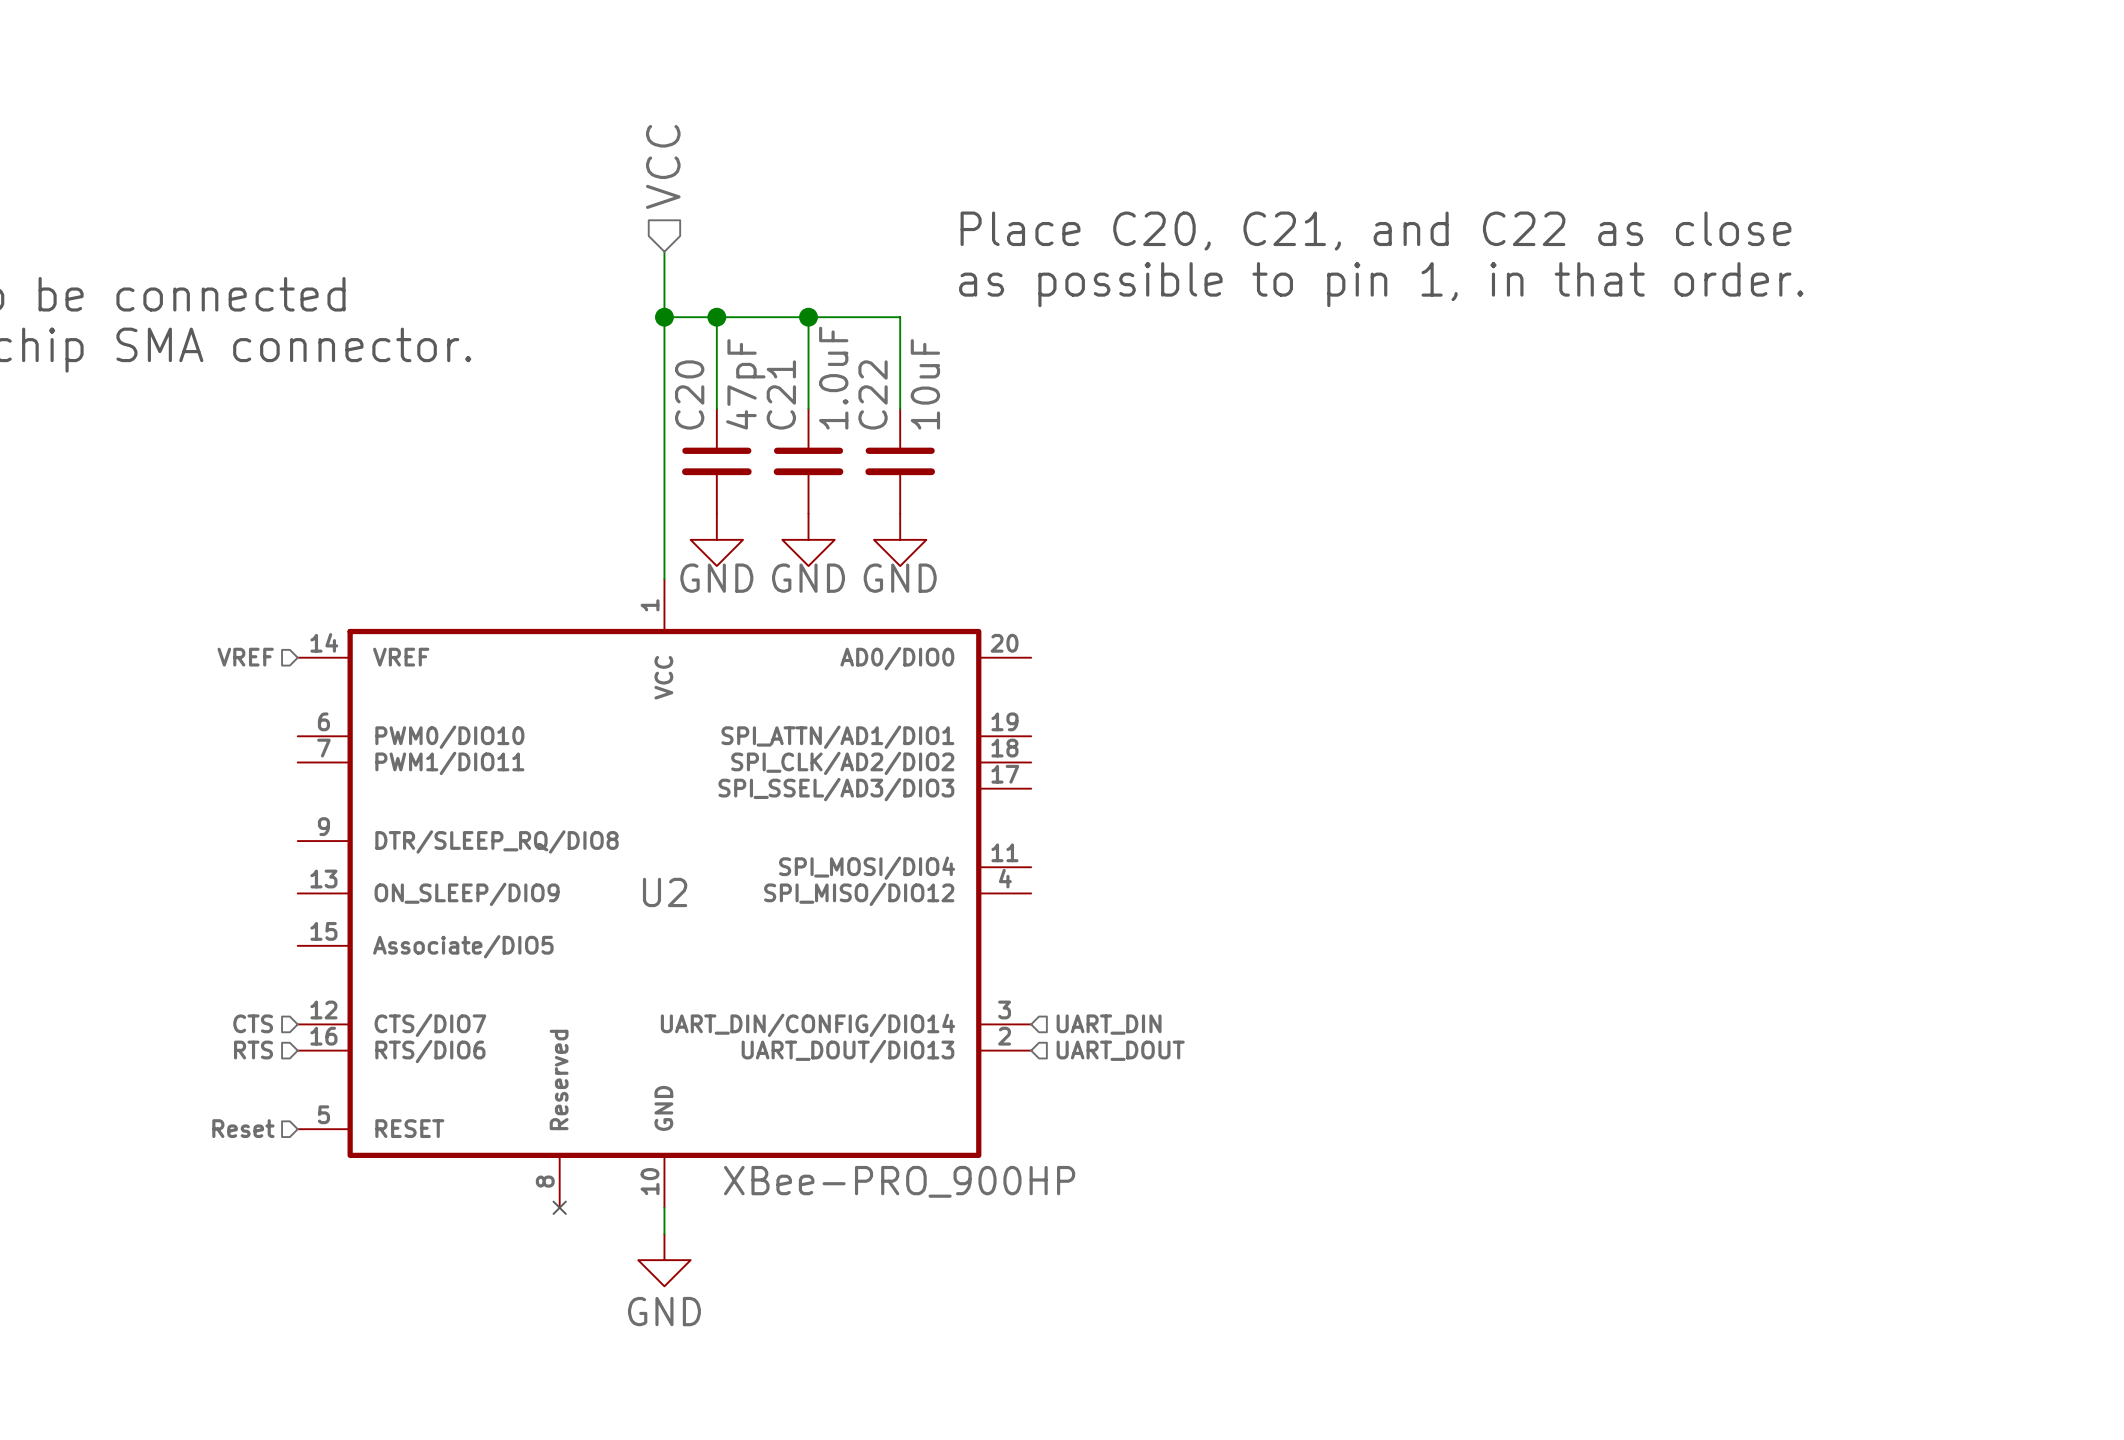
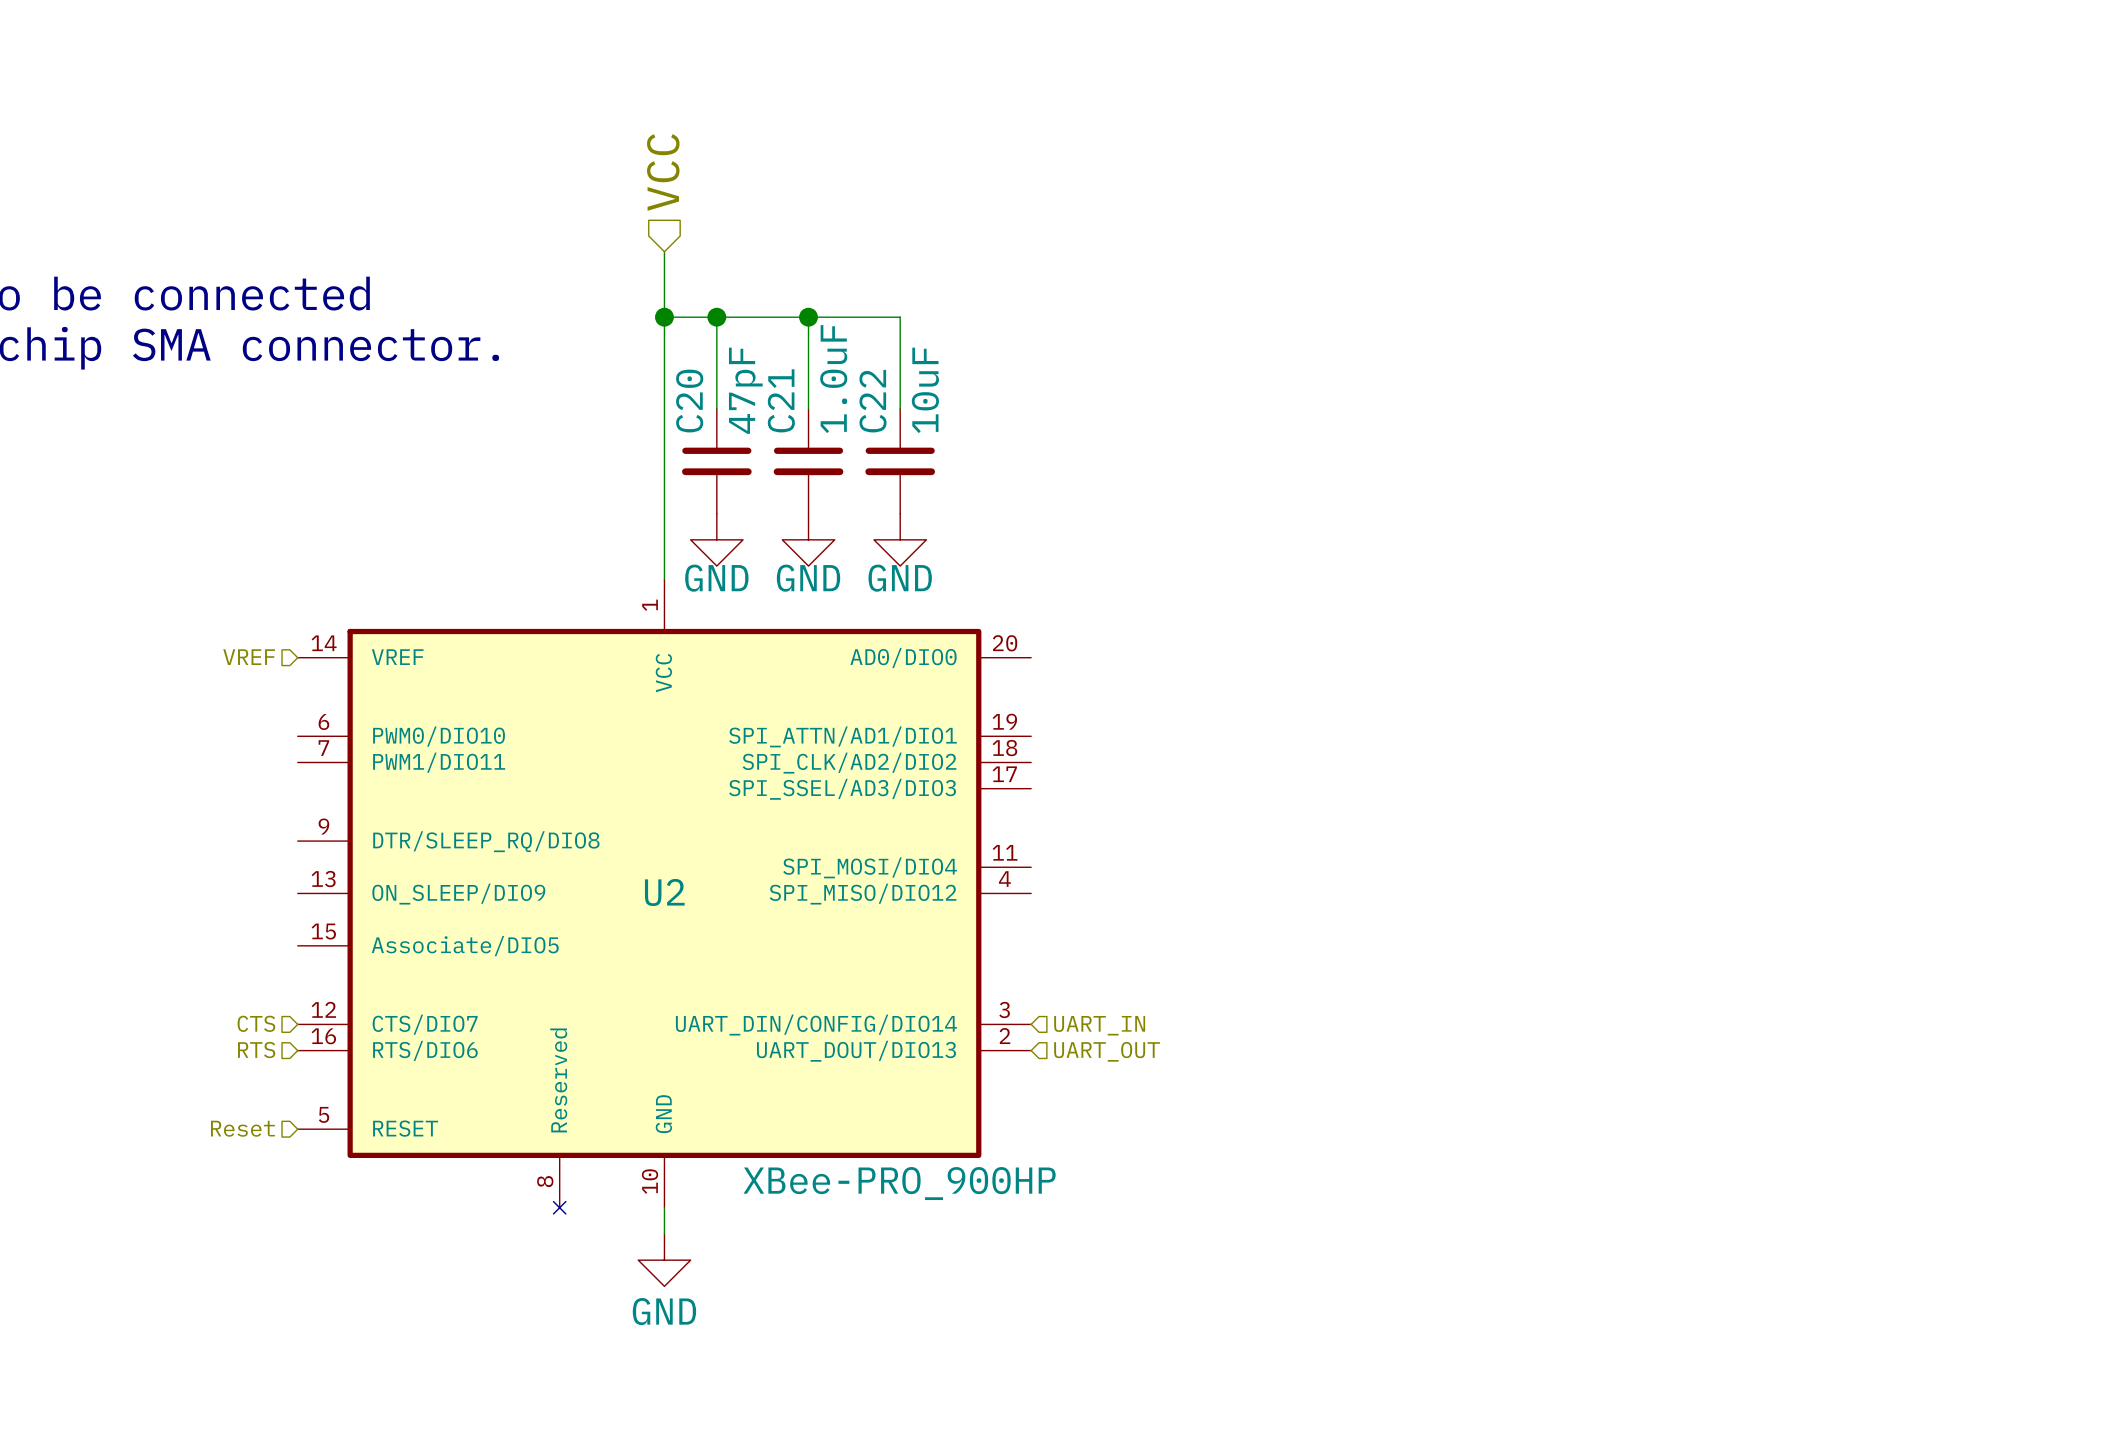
text: Place C20, C21, and C22 as close (1375, 231) -> none
text: as possible to pin 1, in that order. (1381, 284) -> none
hierarchical label: UART_DIN (1109, 1024) -> UART_IN (1099, 1025)
hierarchical label: UART_DOUT (1120, 1050) -> UART_OUT (1107, 1051)

